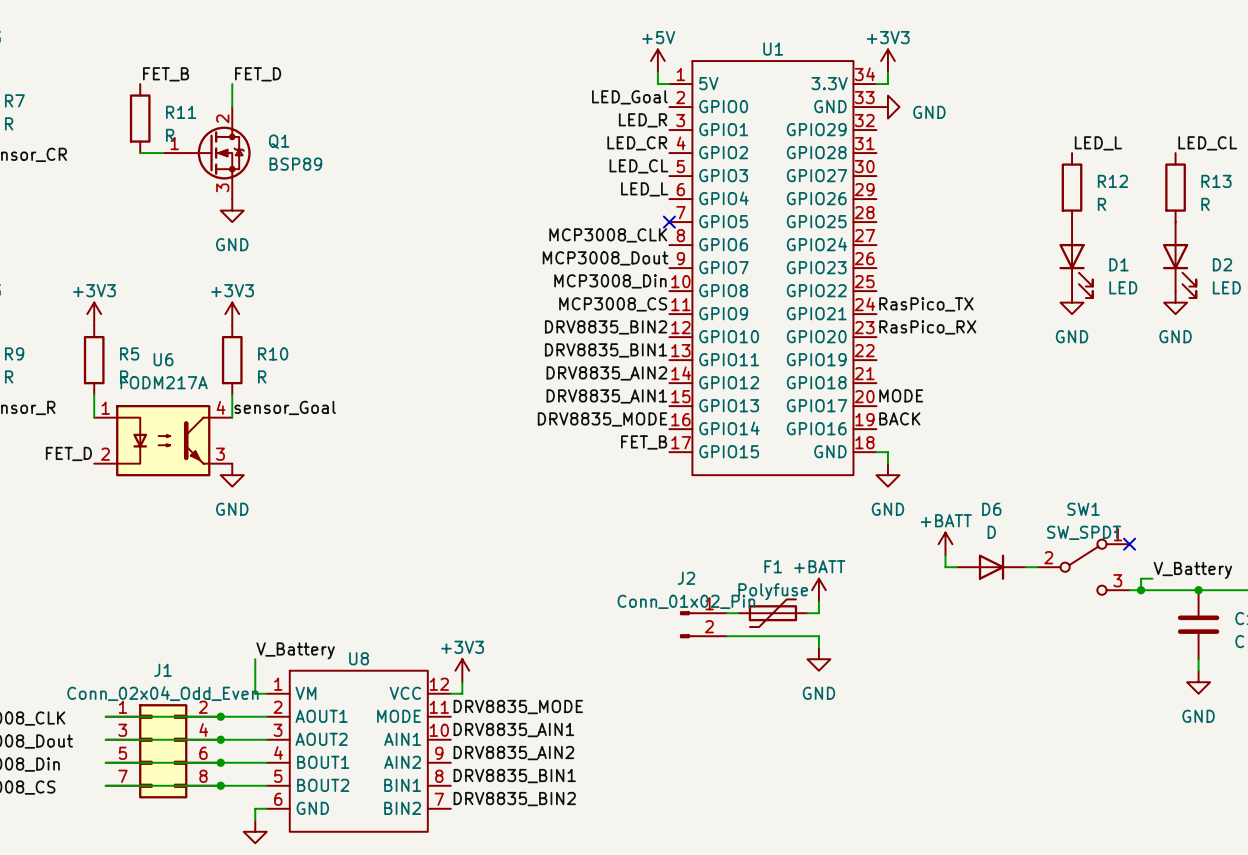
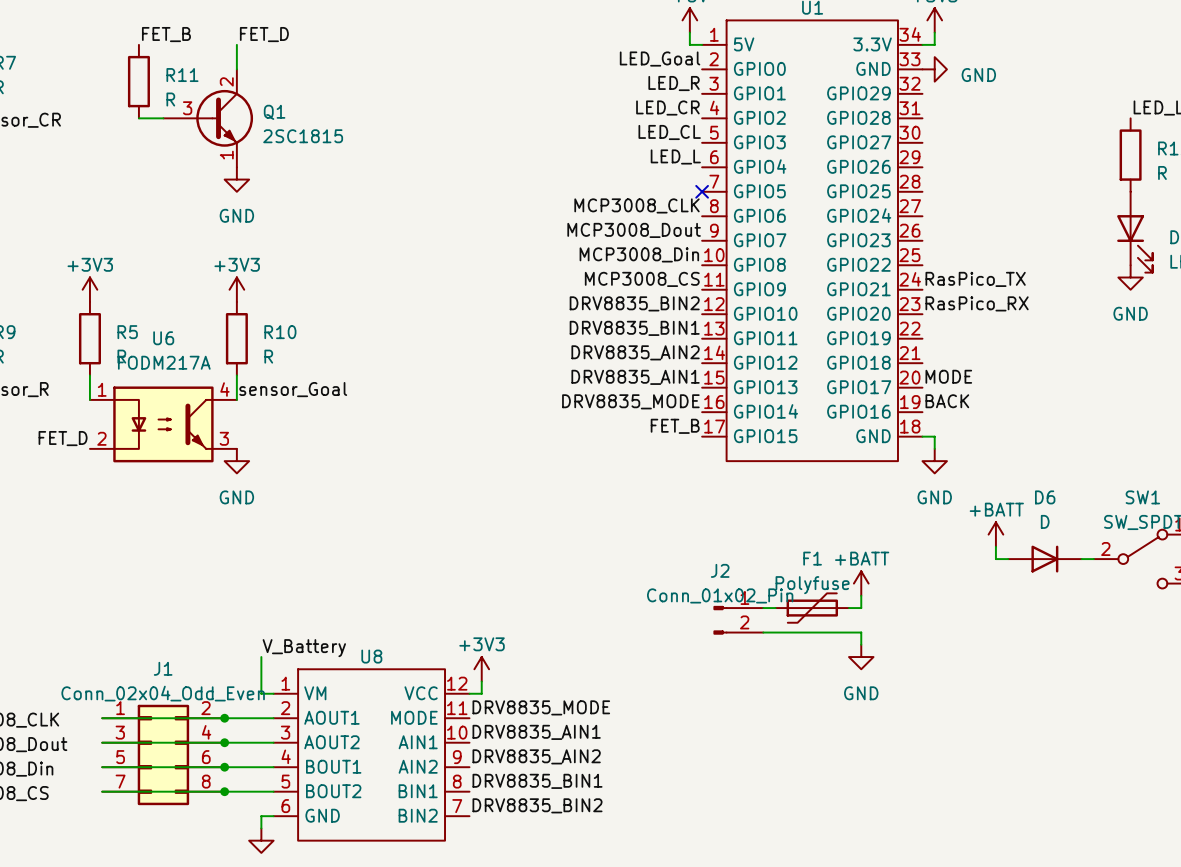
Q1 symbol: [163, 107, 251, 200] -> [163, 69, 254, 168]
Q1 value: BSP89 (295, 164) -> 2SC1815 (303, 136)

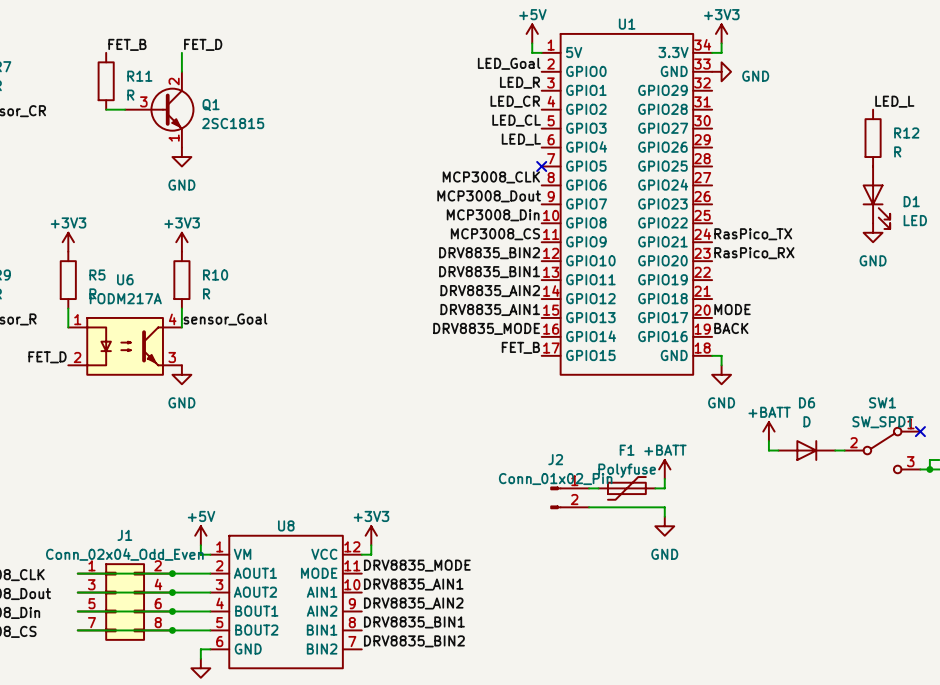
label: V_Battery (304, 648) -> none
power symbol: none -> +5V (200, 535)

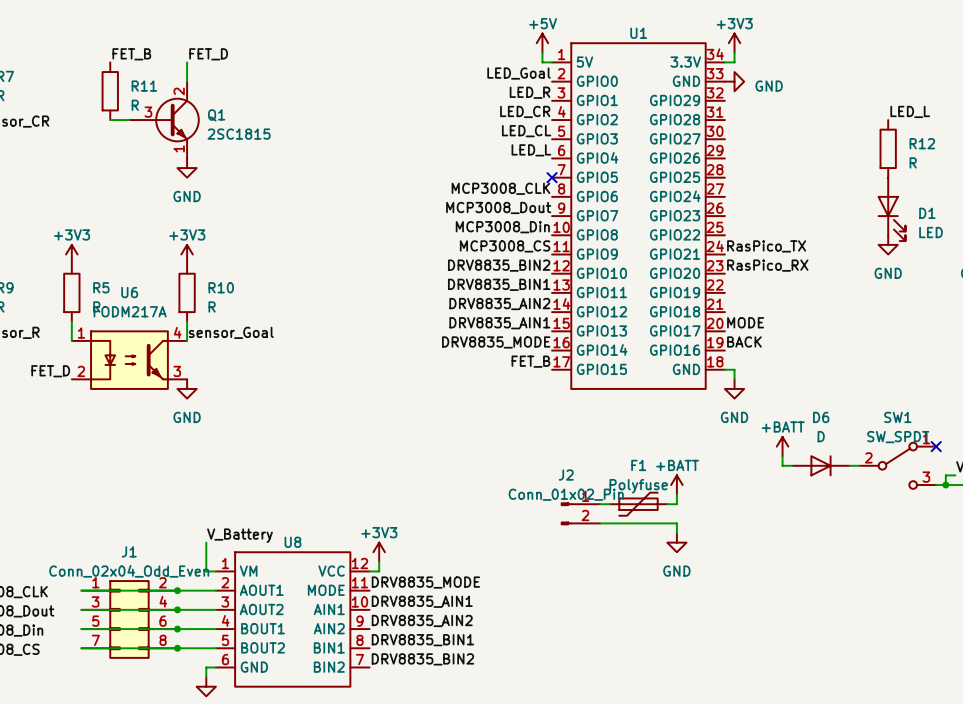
label: none -> V_Battery (239, 535)
power symbol: +5V (200, 535) -> none

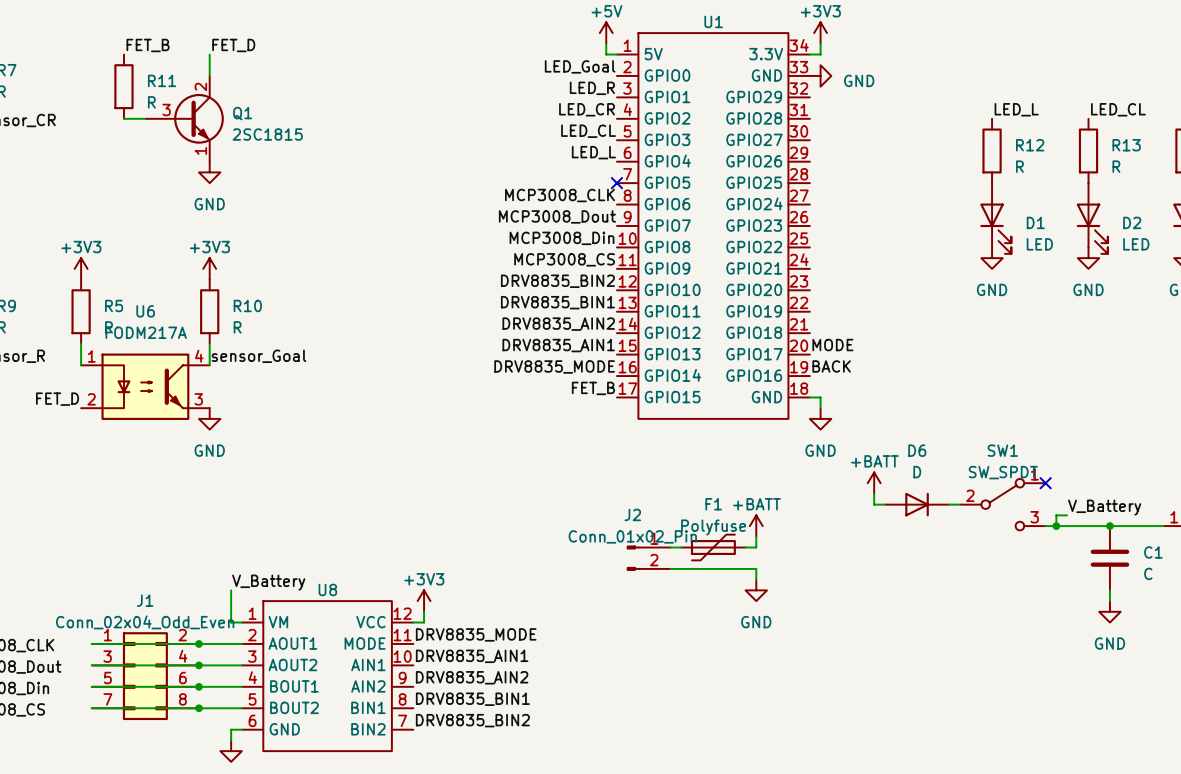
label: RasPico_TX (766, 246) -> none
label: RasPico_RX (767, 265) -> none

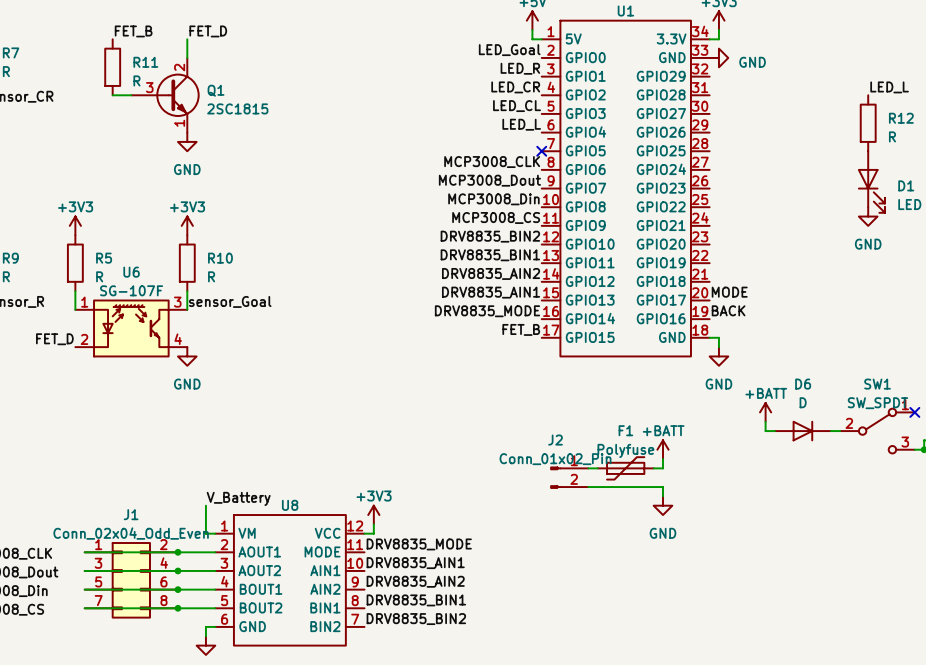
U6 value: FODM217A (146, 332) -> SG-107F (131, 290)
U6 symbol: [81, 353, 210, 420] -> [75, 299, 188, 358]

